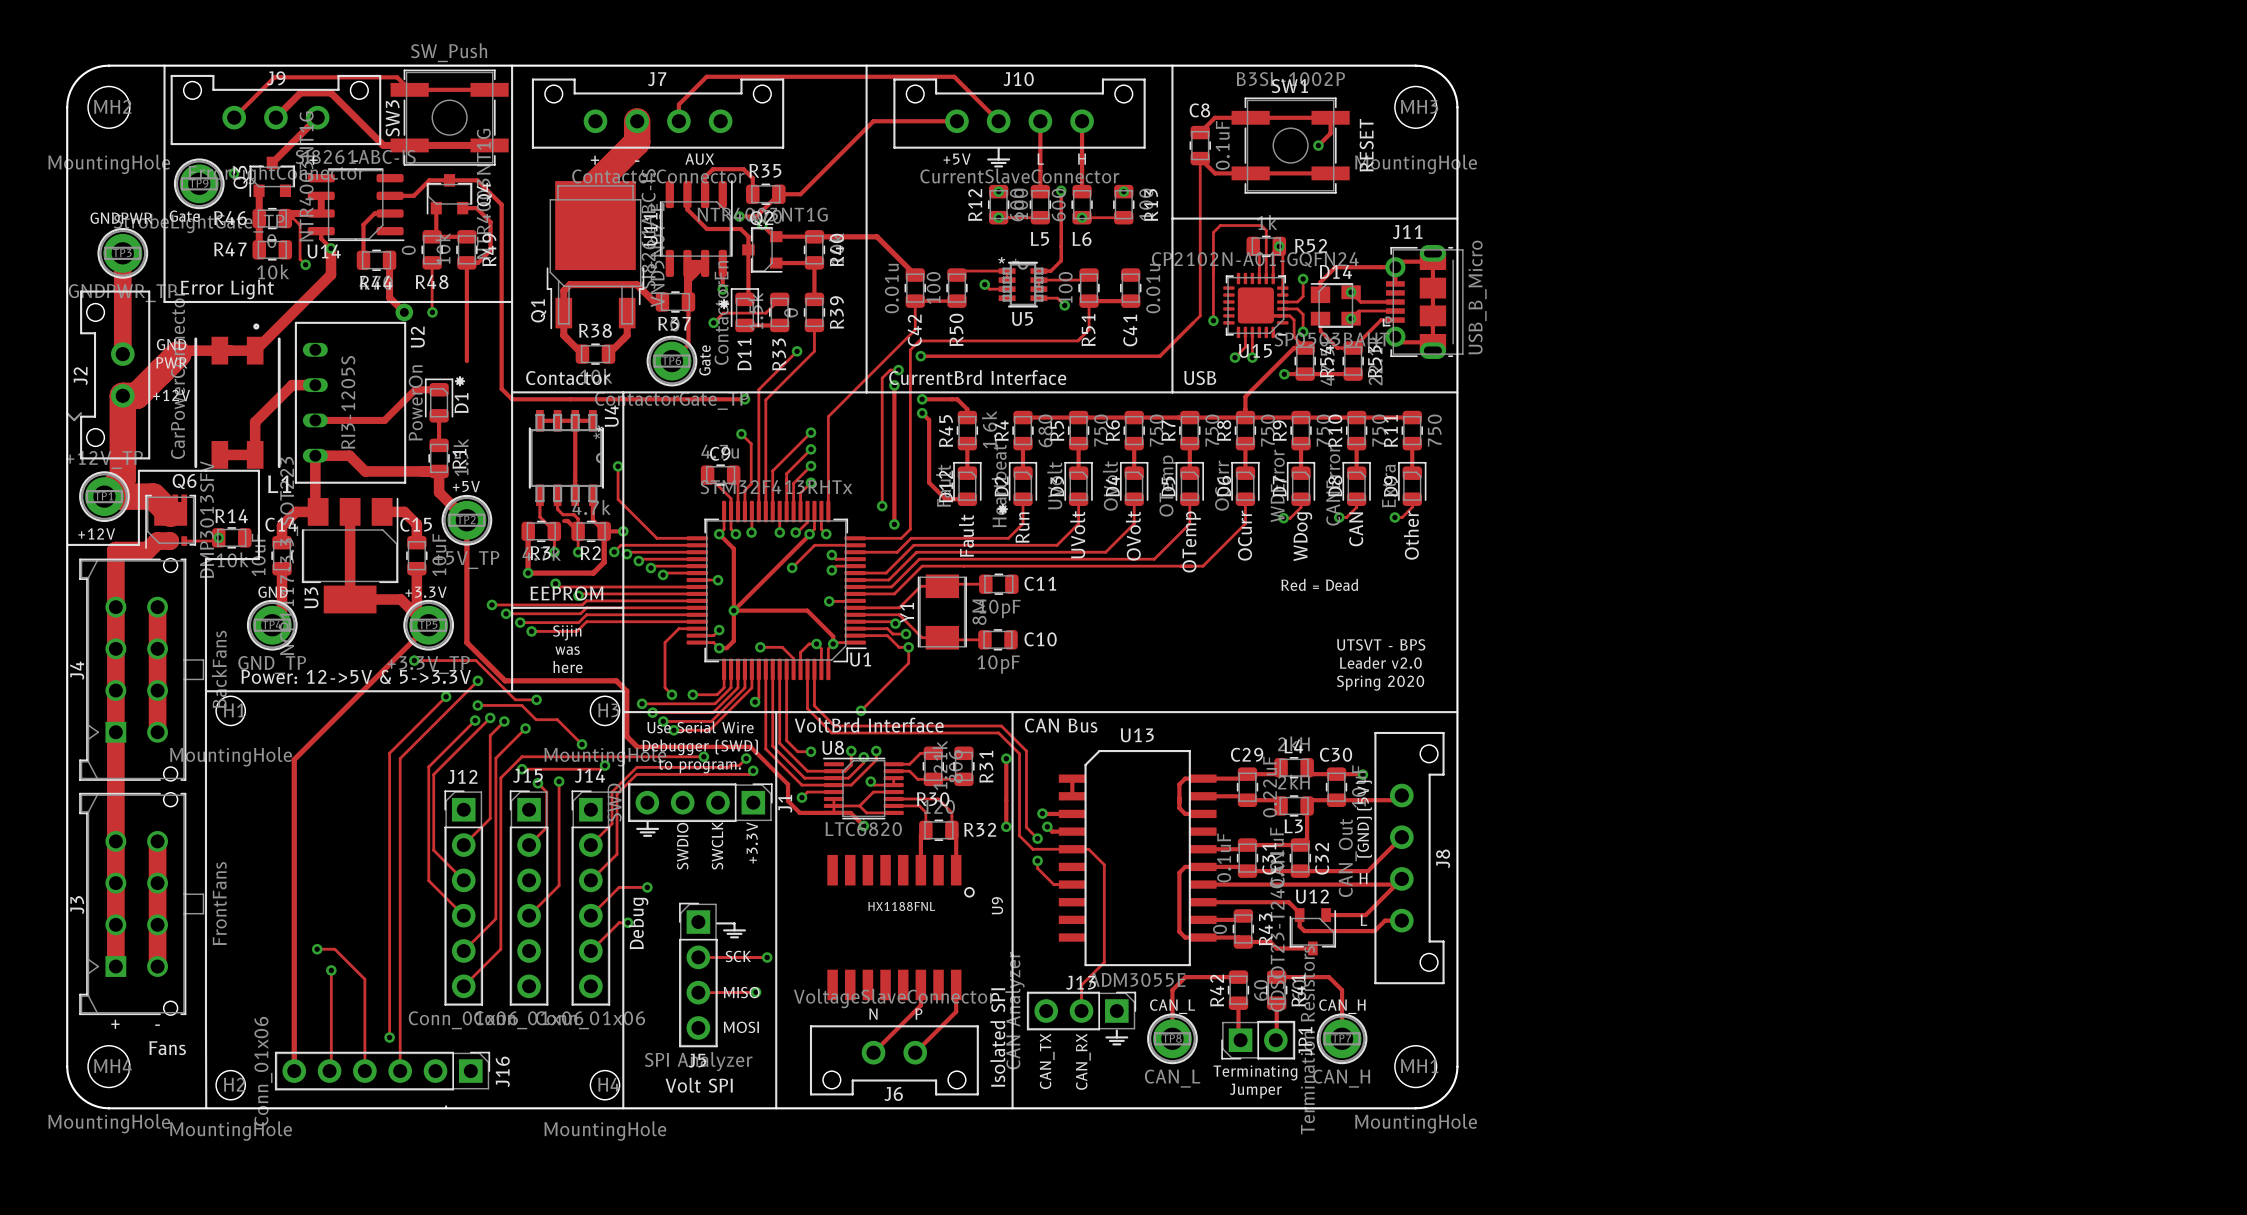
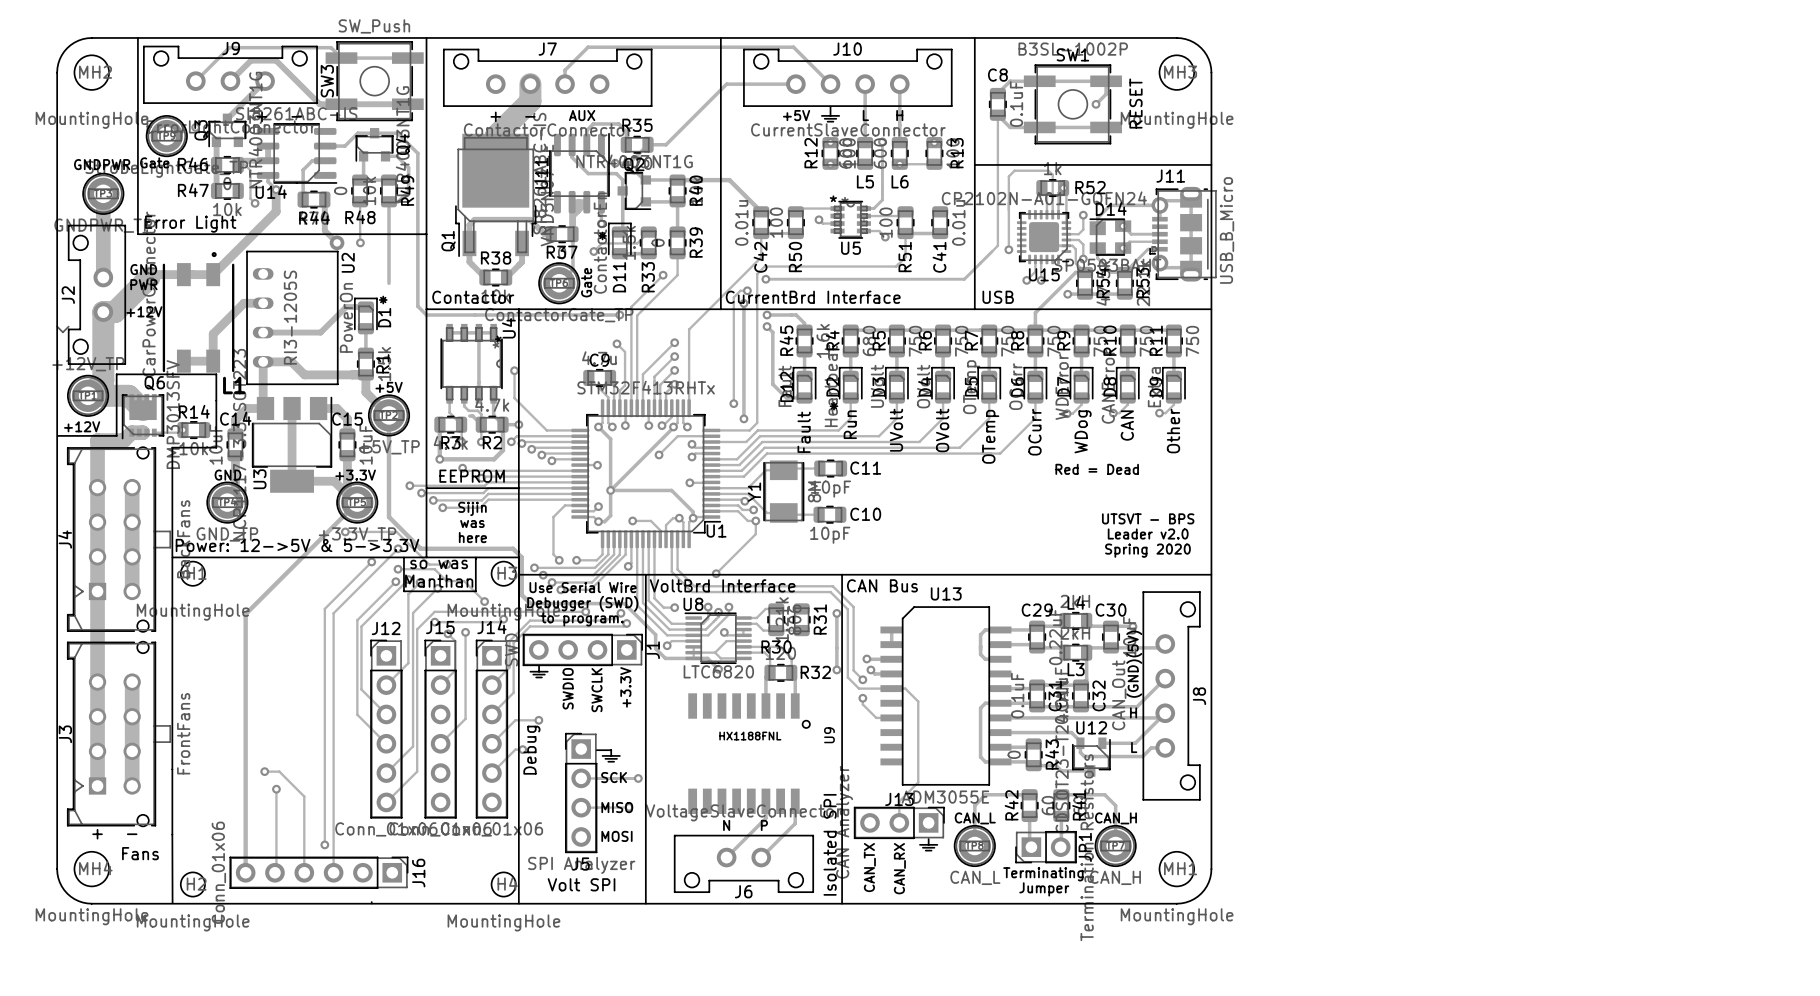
line: none -> (403, 557) (403, 591) (475, 591) (475, 557)
text: none -> so was (439, 564)
text: none -> Manthan (439, 581)

